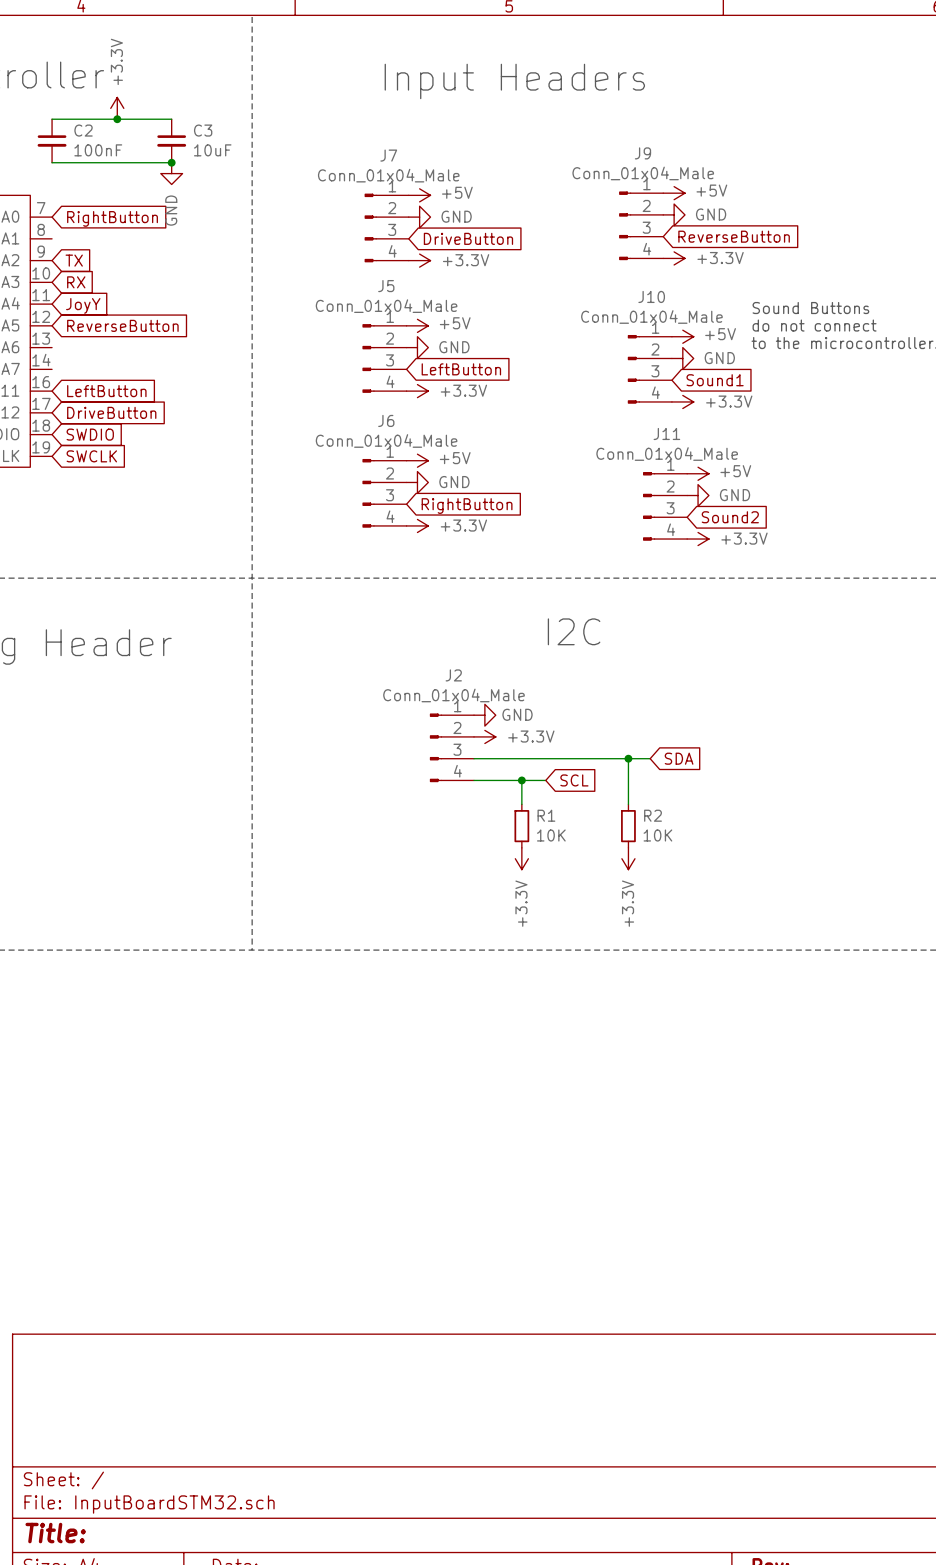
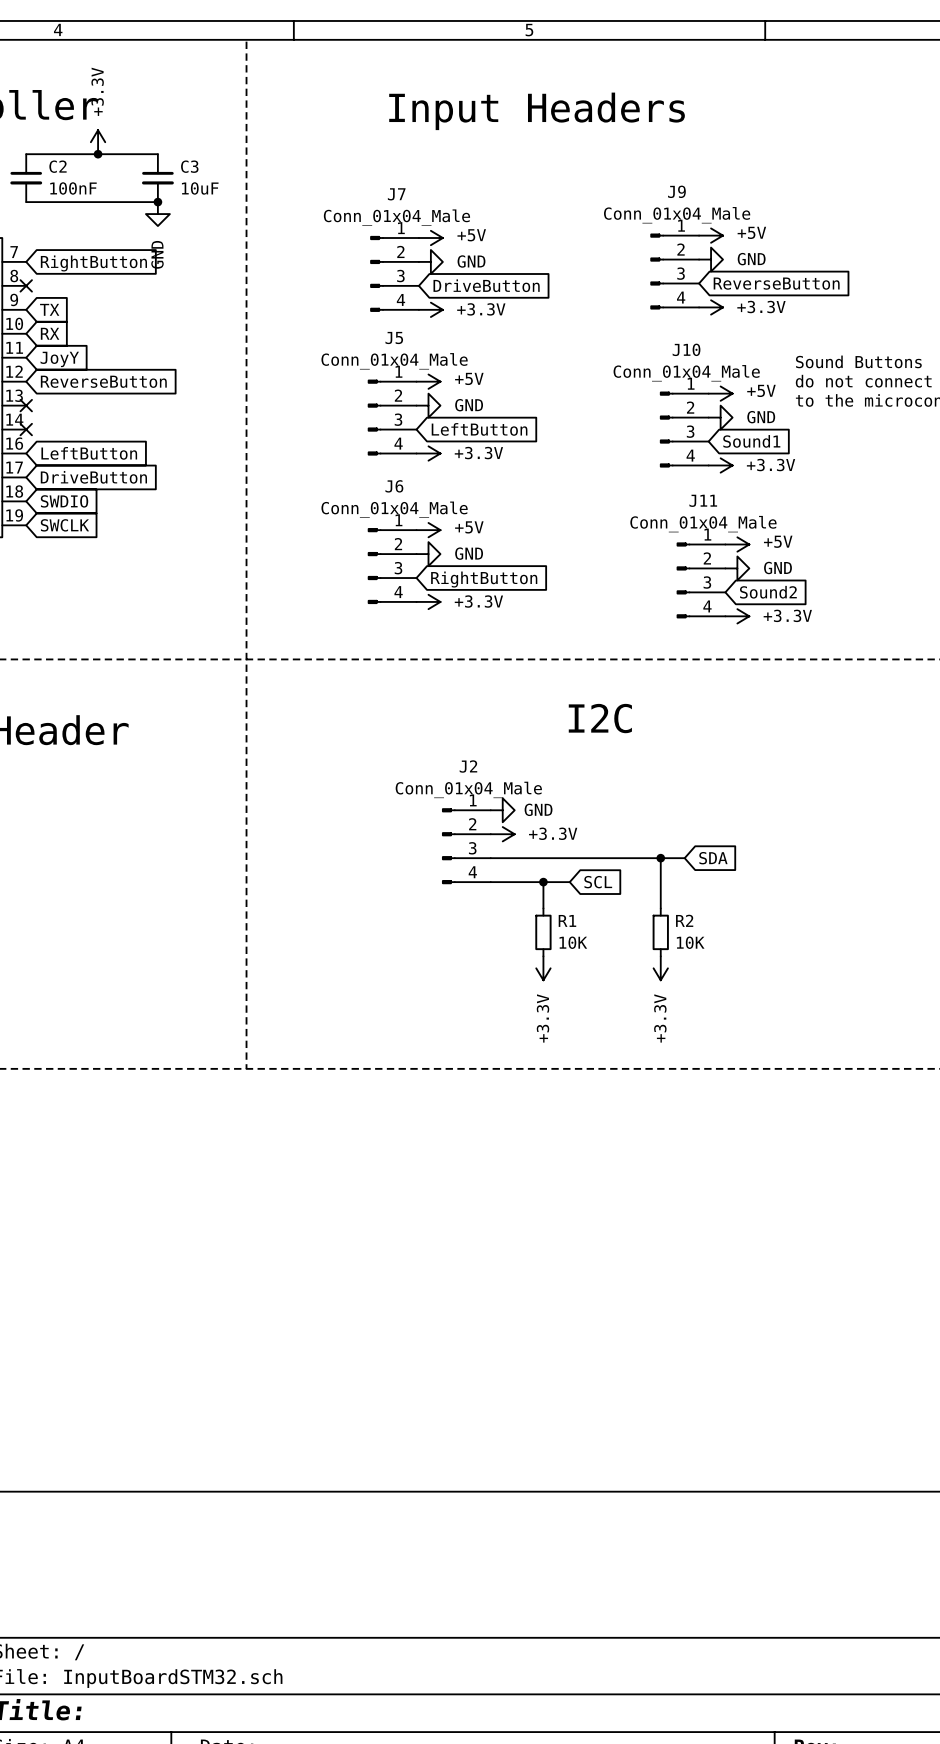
no-connect mark: none -> (26, 285)
no-connect mark: none -> (26, 405)
no-connect mark: none -> (26, 429)

